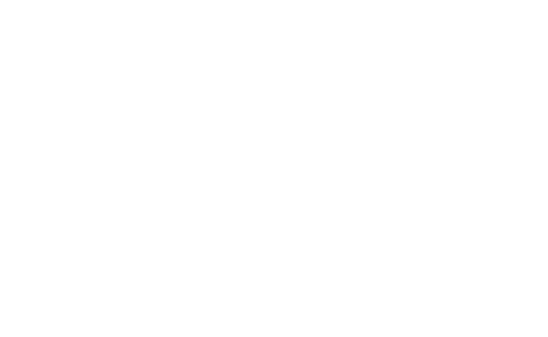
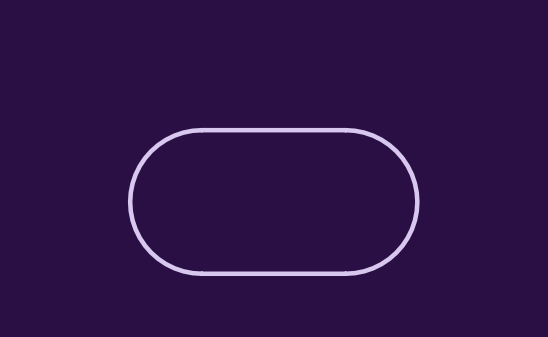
drawing: none -> [127, 127, 420, 277]

